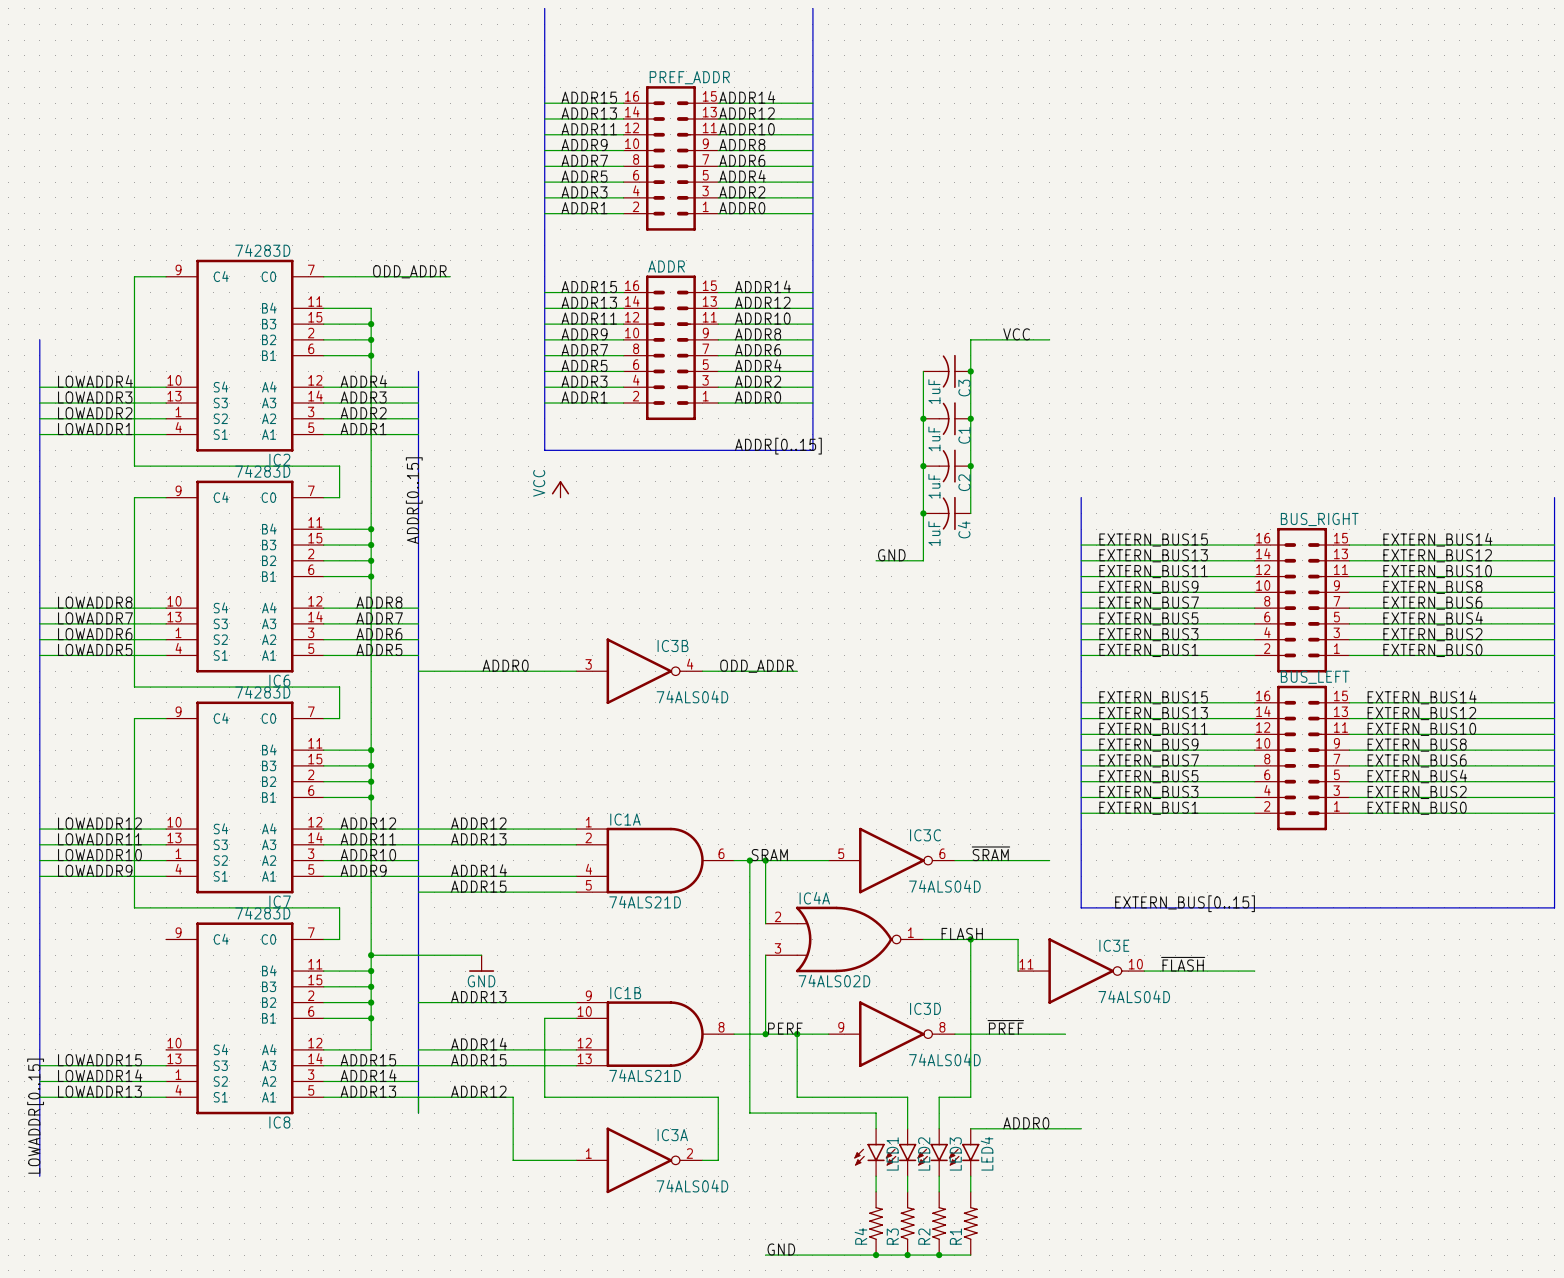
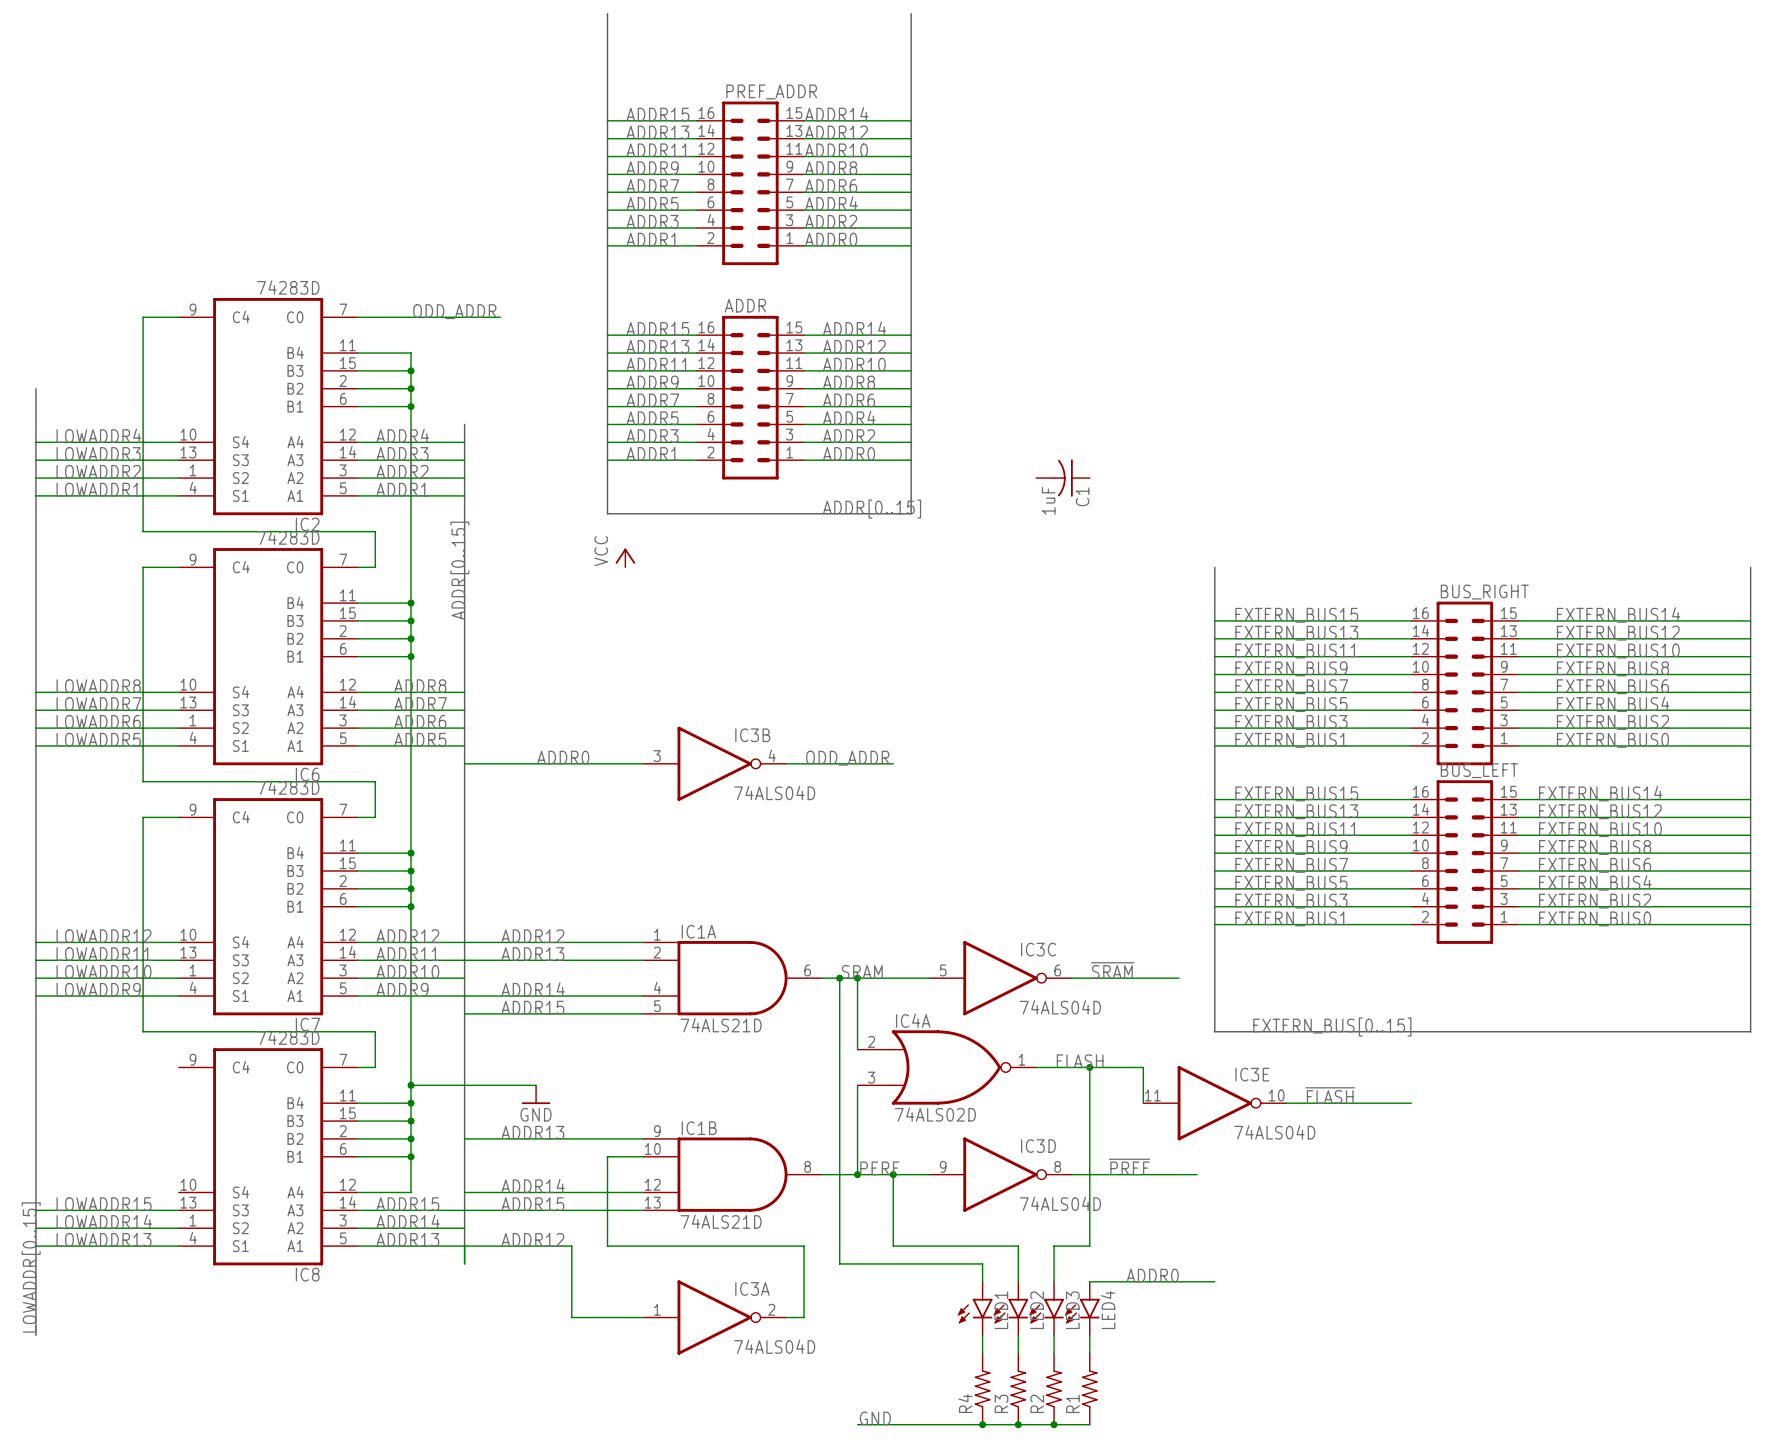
label: VCC (1016, 334) -> none
wire: (1049, 339) (970, 339) (970, 513) -> none
wire: (923, 371) (923, 560) (876, 560) -> none
C3: 1uF (947, 371) -> none
junction: (970, 371) -> none
junction: (923, 418) -> none
junction: (970, 418) -> none
junction: (923, 466) -> none
C2: 1uF (947, 466) -> none
junction: (970, 466) -> none
junction: (923, 513) -> none
C4: 1uF (947, 513) -> none
label: GND (891, 555) -> none

